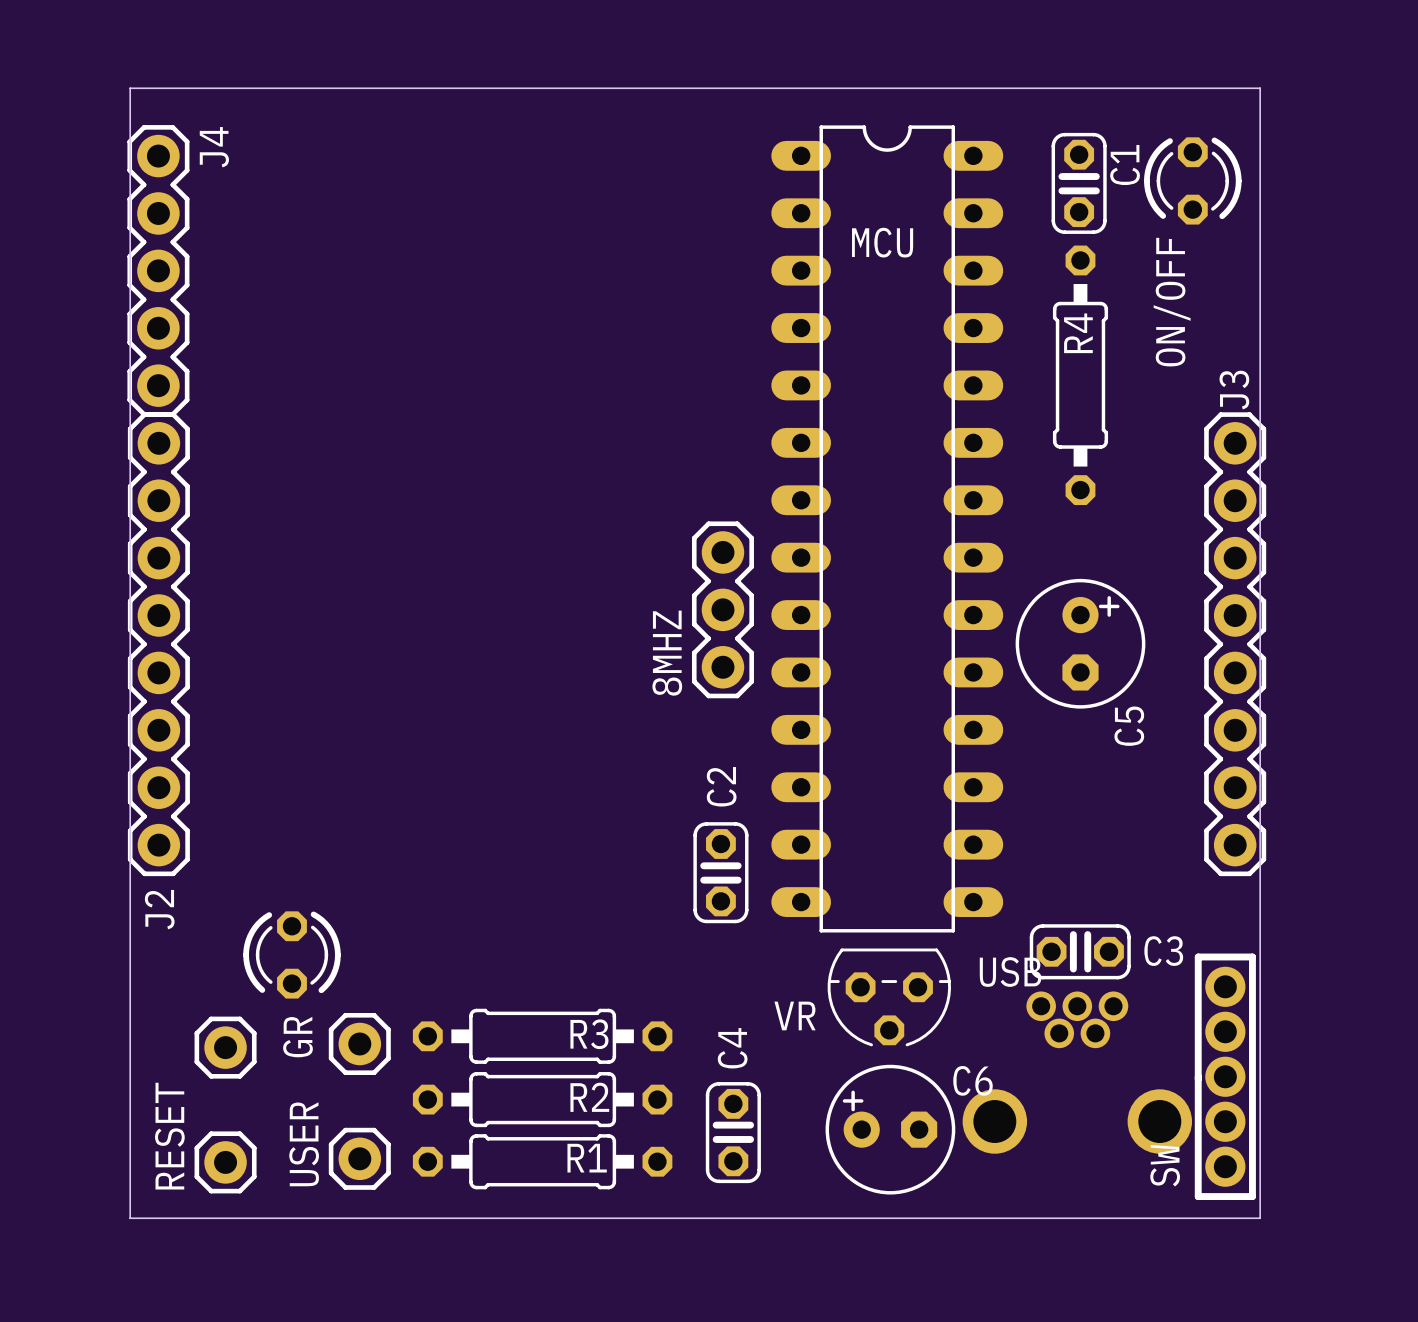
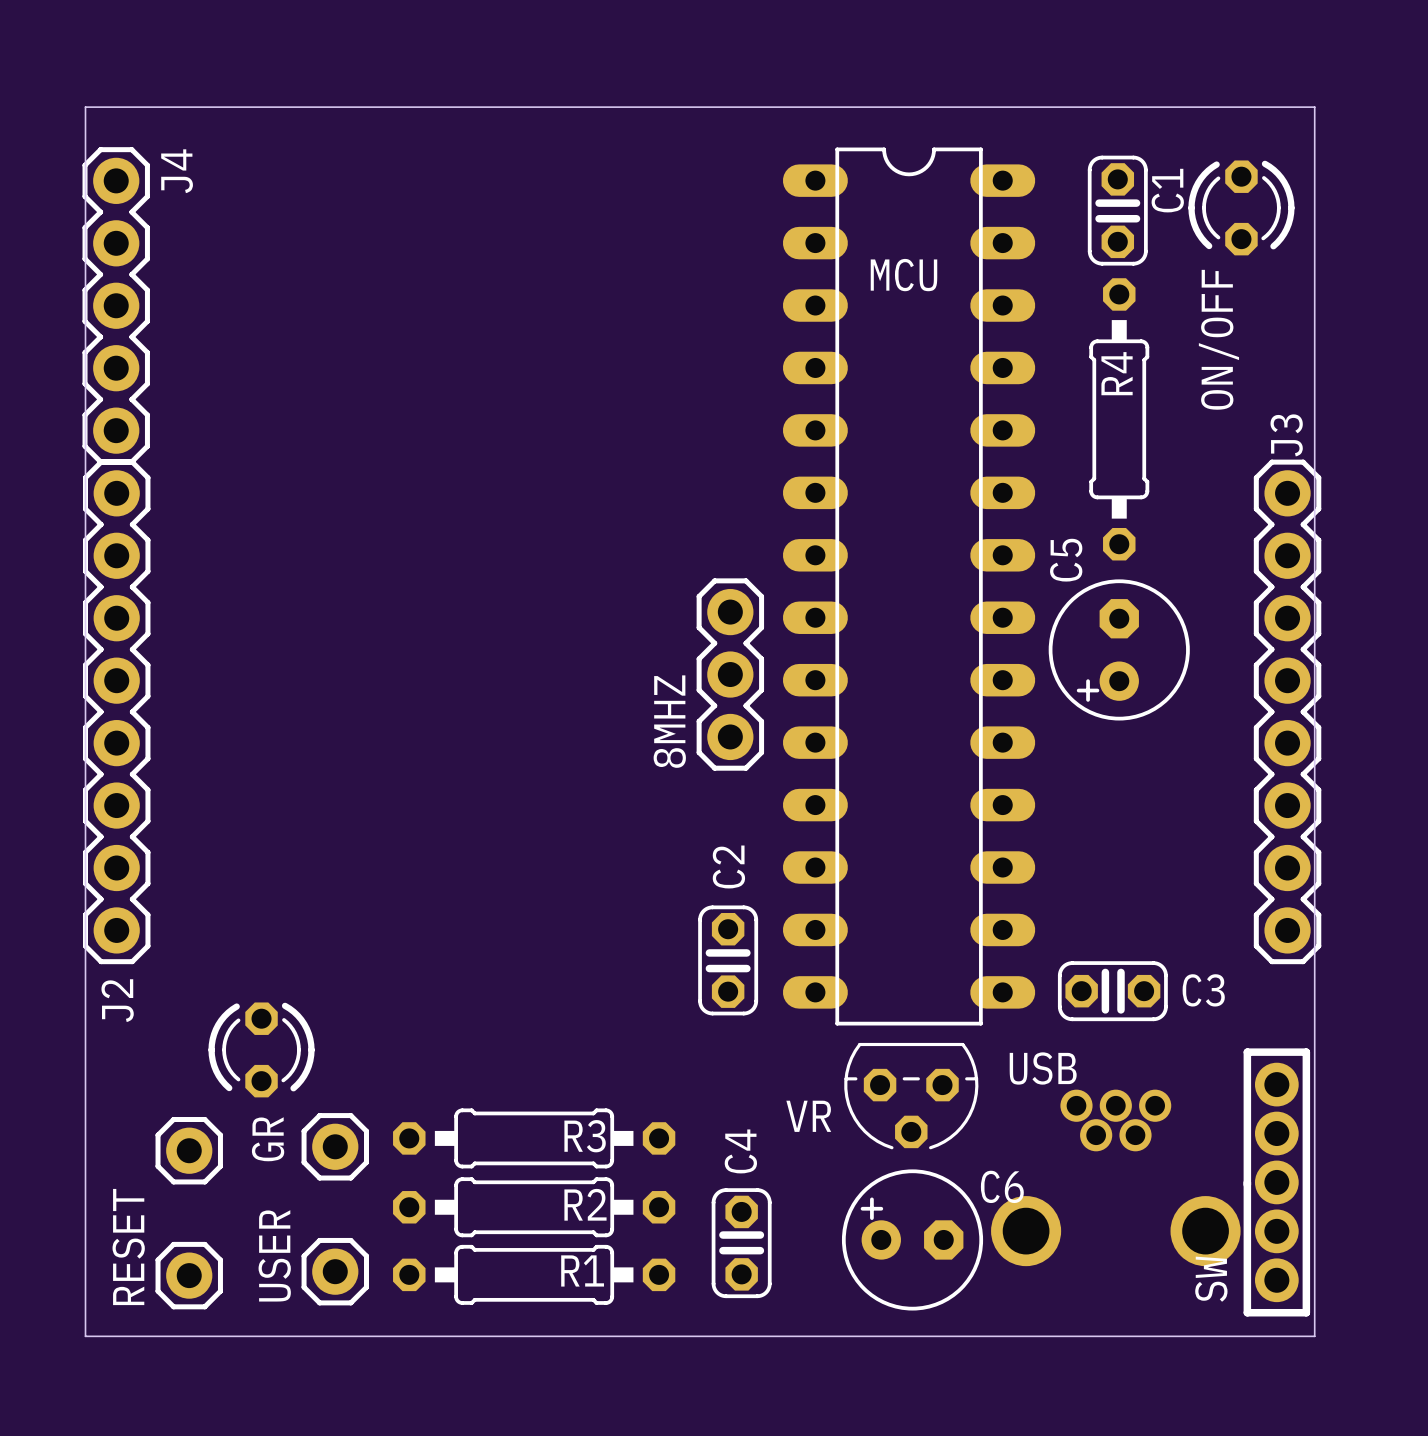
C5 rotation: 0° (1080, 643) -> 180° (1119, 649)
C3 position: (1080, 951) -> (1112, 991)

